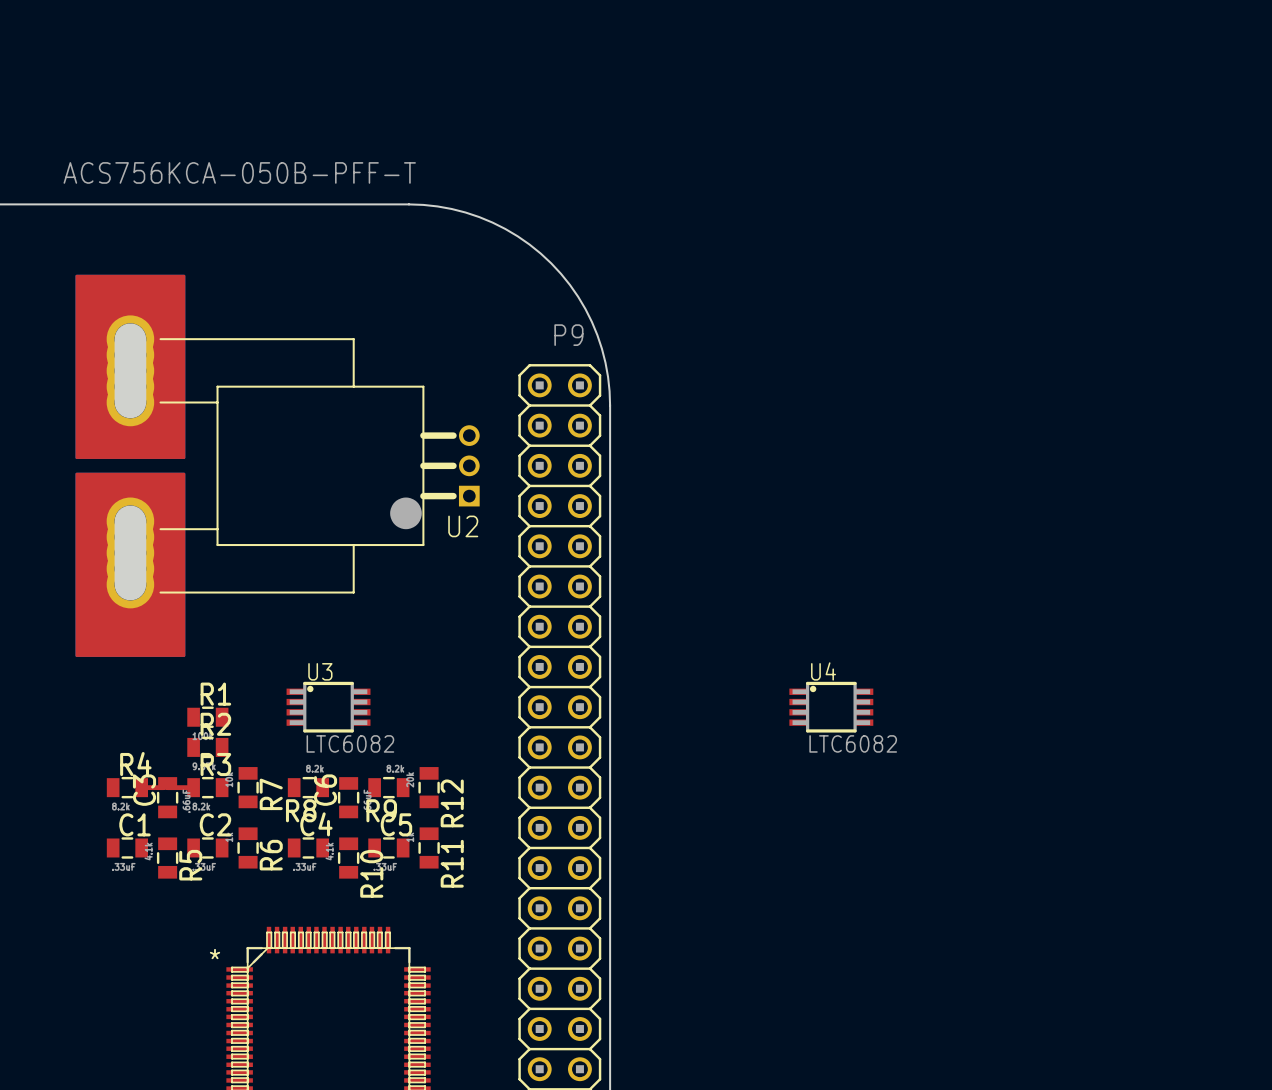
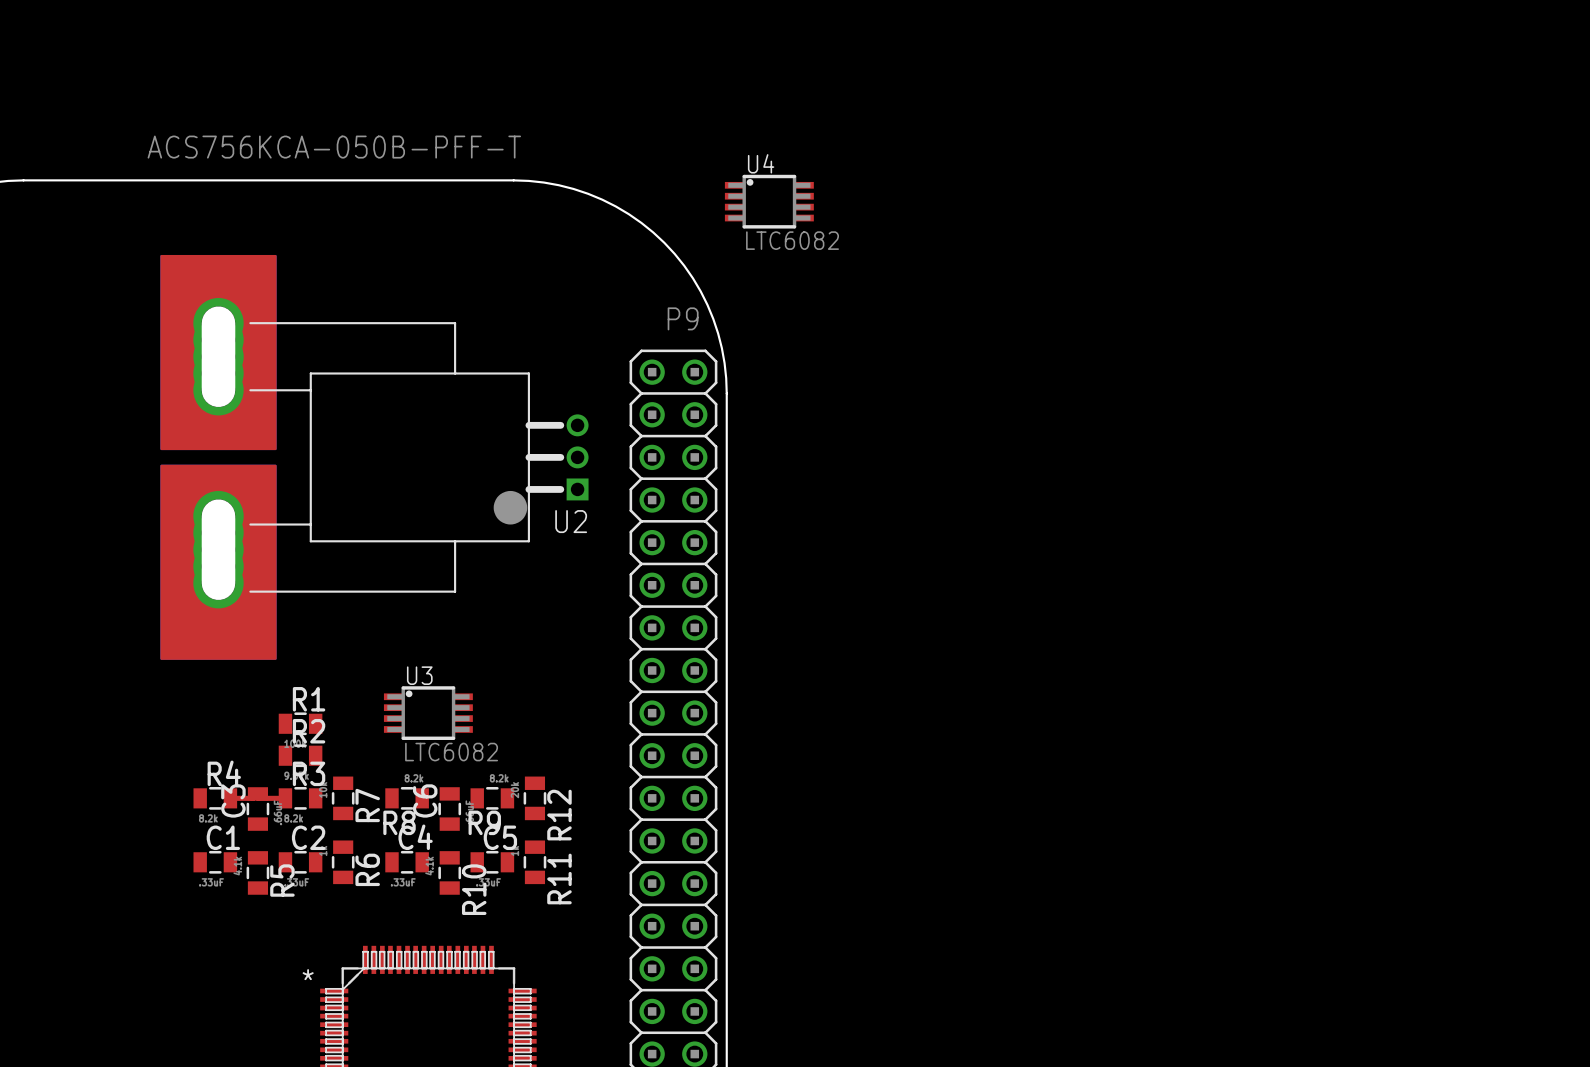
U4 position: (831, 707) -> (769, 201)

